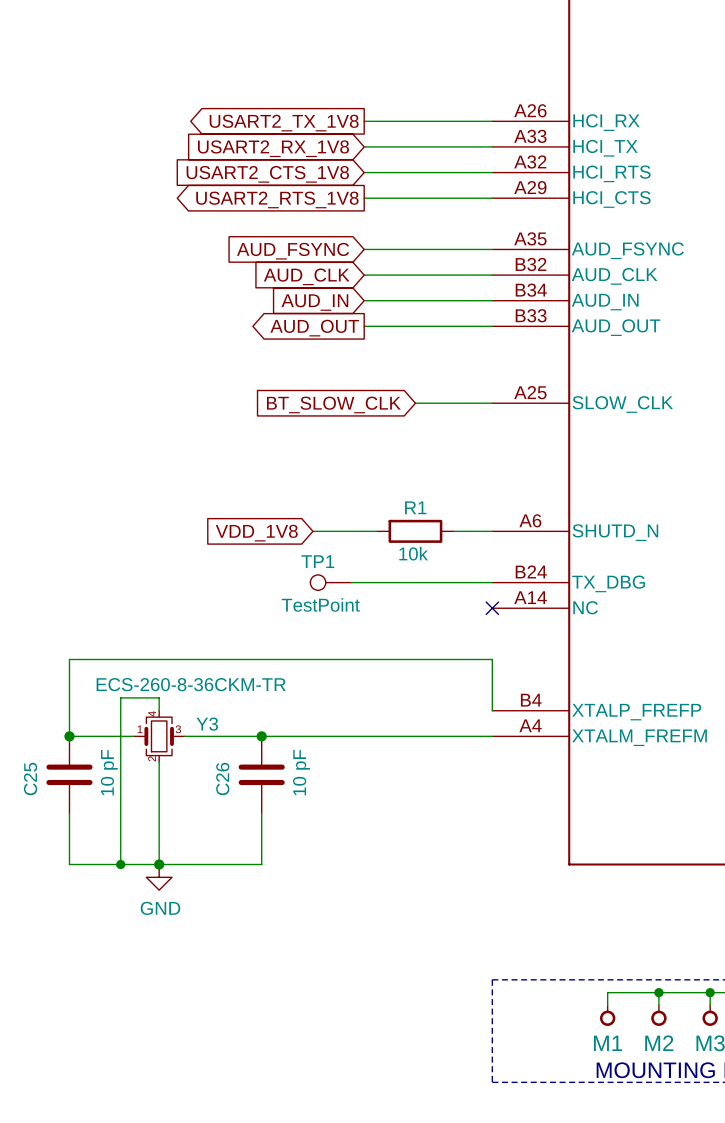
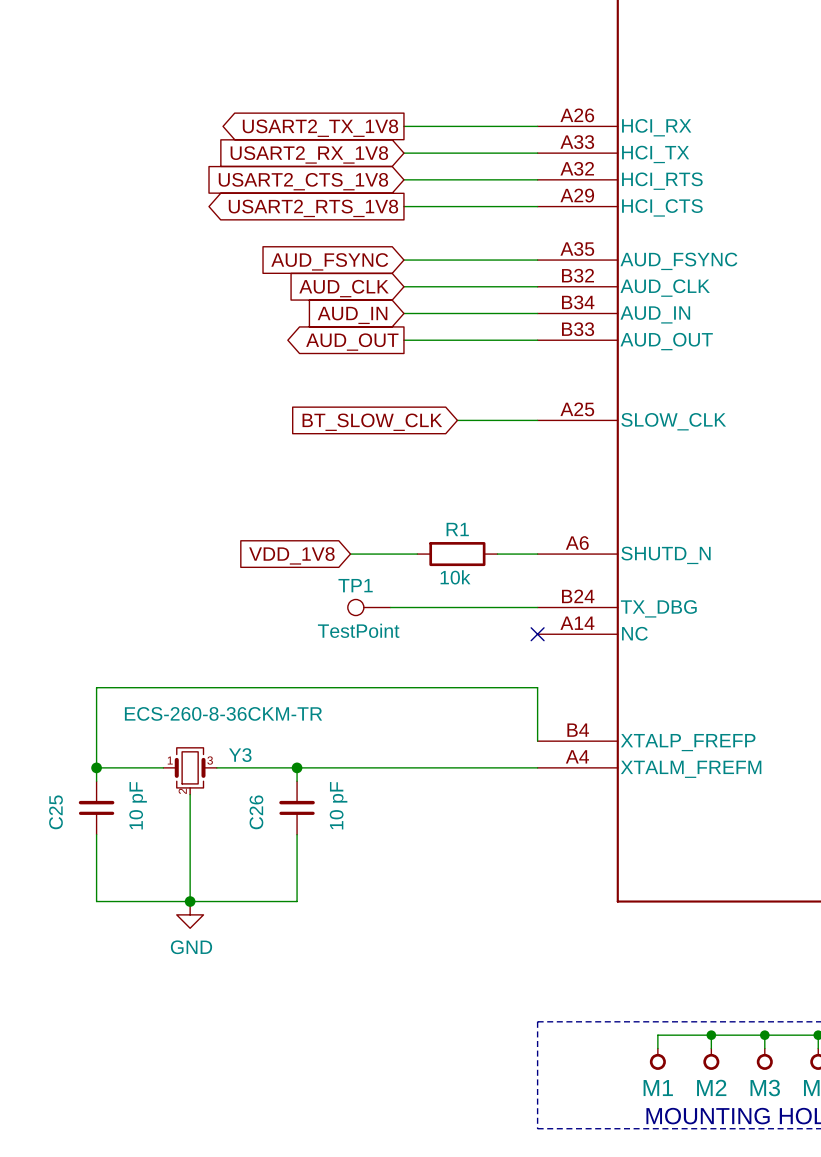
Y3 symbol: [133, 710, 185, 763] -> [163, 747, 217, 795]
wire: (159, 710) (159, 697) (120, 697) (120, 864) -> none
C25 symbol: [46, 736, 93, 814] -> [78, 781, 115, 835]
C26 symbol: [238, 736, 285, 814] -> [279, 781, 315, 835]
junction: (120, 864) -> none

